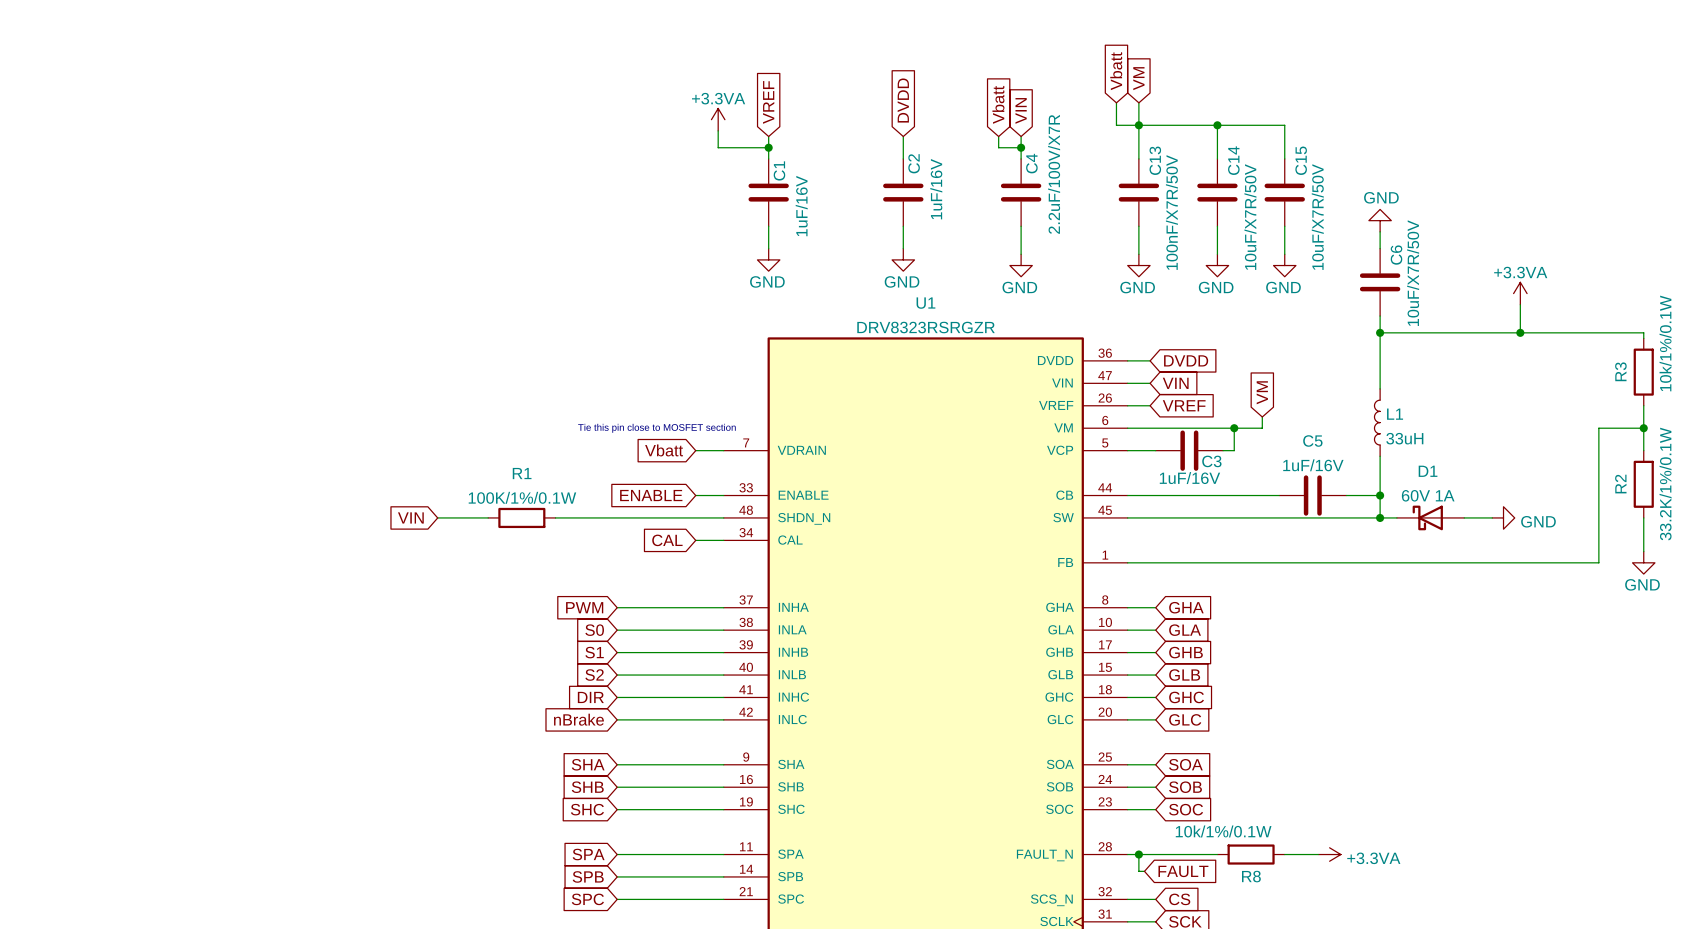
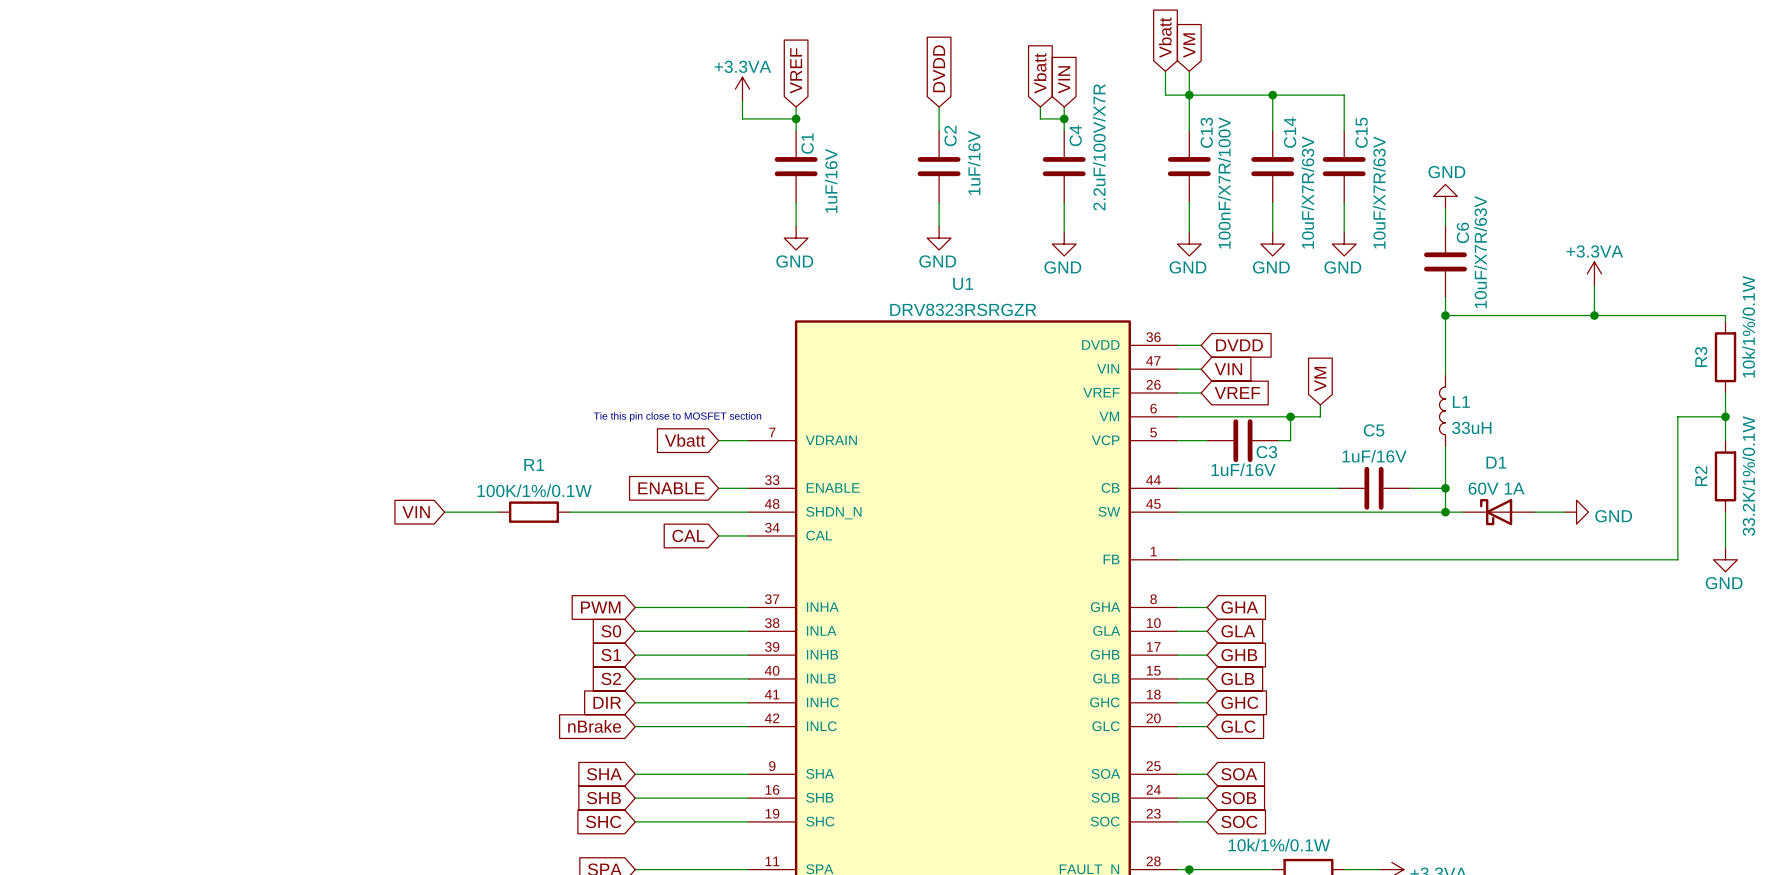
C13 value: 100nF/X7R/50V (1171, 212) -> 100nF/X7R/100V (1224, 182)
C14 value: 10uF/X7R/50V (1250, 217) -> 10uF/X7R/63V (1307, 192)
C15 value: 10uF/X7R/50V (1317, 217) -> 10uF/X7R/63V (1379, 192)
C6 value: 10uF/X7R/50V (1413, 273) -> 10uF/X7R/63V (1480, 252)

